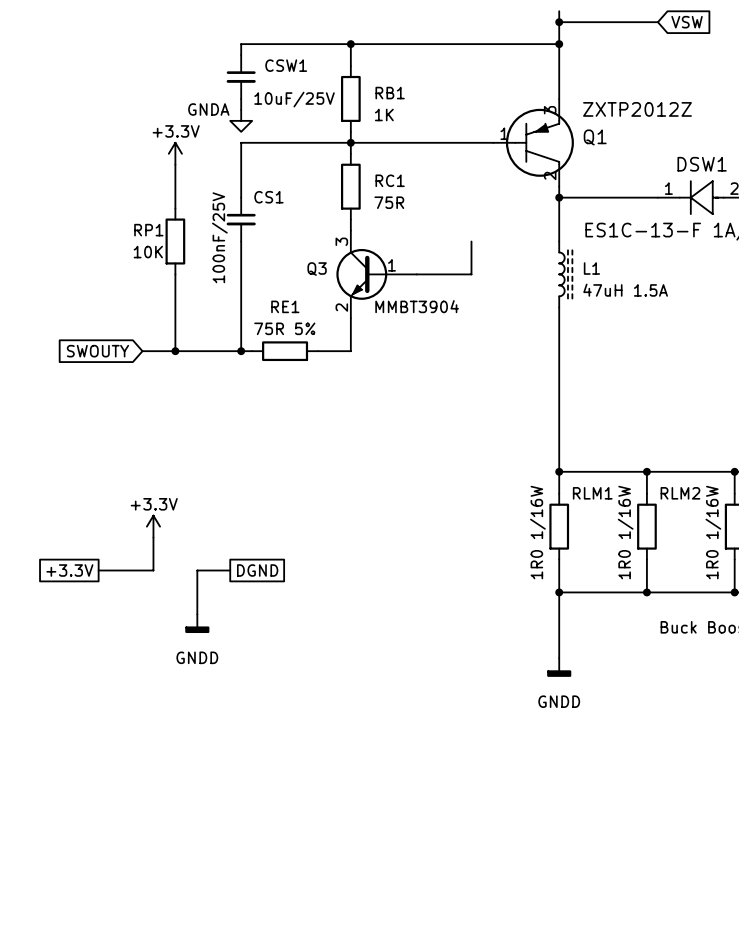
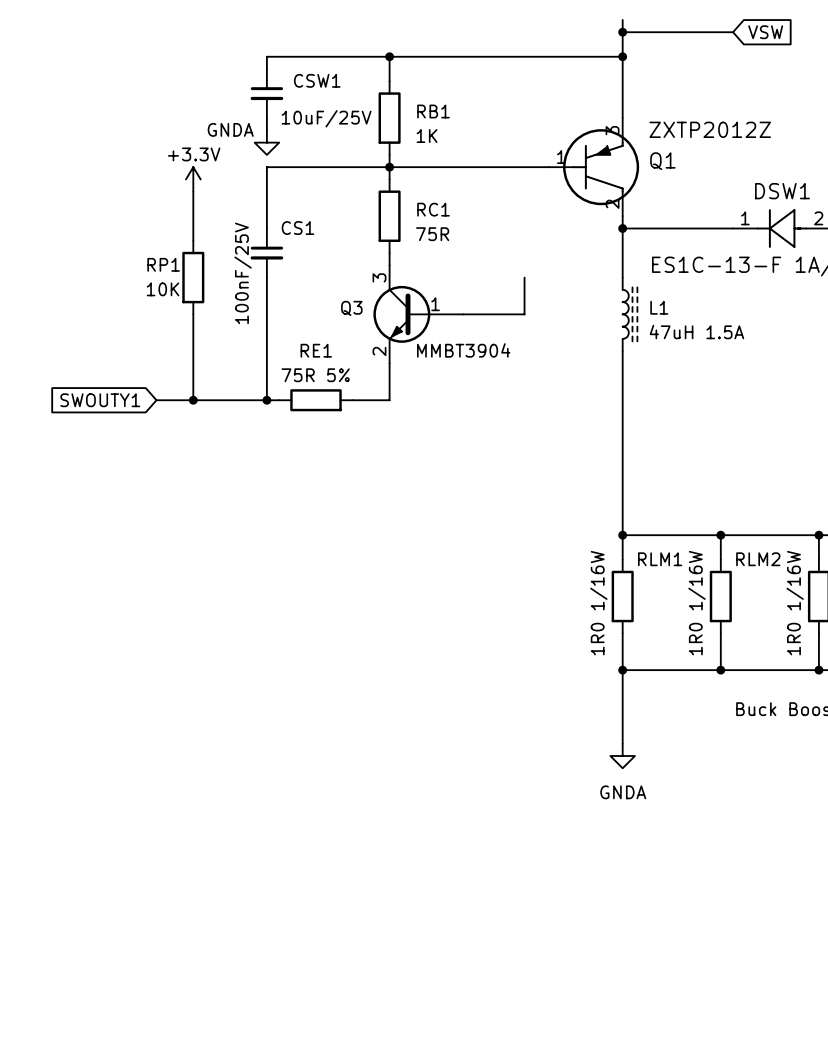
global label: SWOUTY (97, 351) -> SWOUTY1 (100, 400)
power symbol: +3.3V (153, 526) -> none
wire: (153, 537) (153, 570) (98, 570) -> none
global label: +3.3V (69, 570) -> none
wire: (230, 570) (197, 570) (197, 614) -> none
global label: DGND (257, 570) -> none
power symbol: GNDD (197, 623) -> none
power symbol: GNDD (559, 667) -> GNDA (622, 756)

